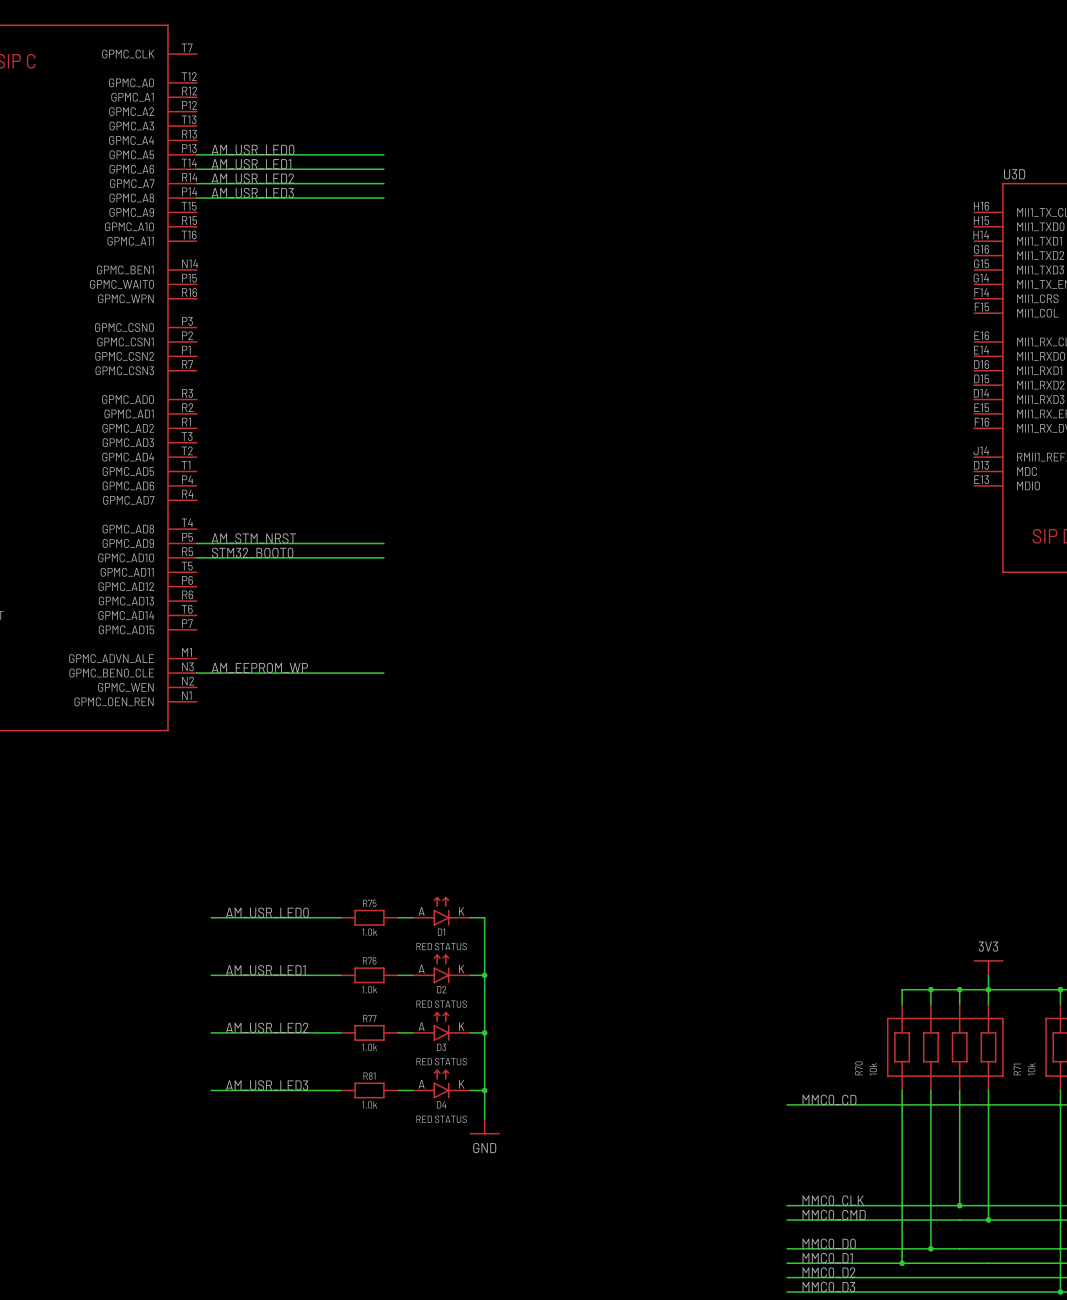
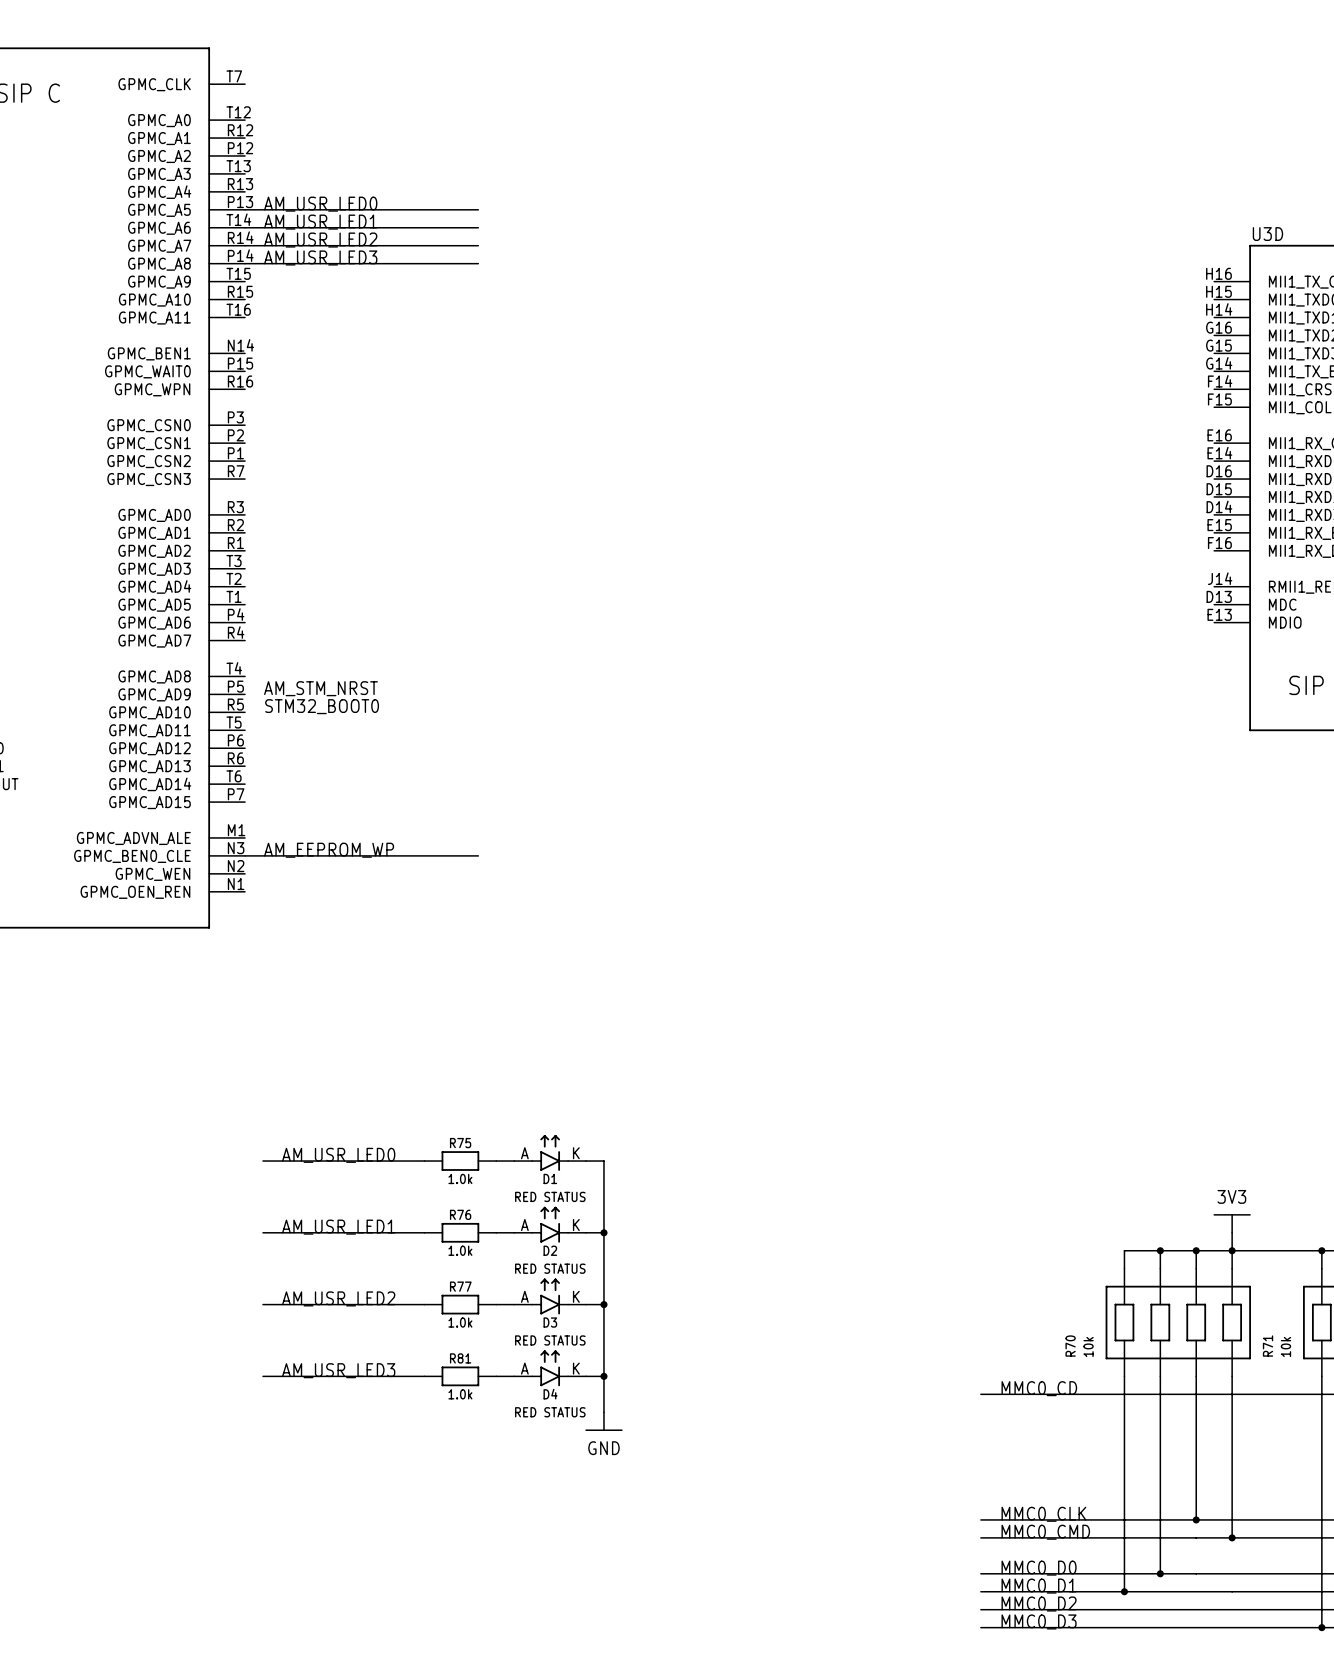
wire: (196, 543) (383, 543) -> none
wire: (196, 557) (383, 557) -> none

